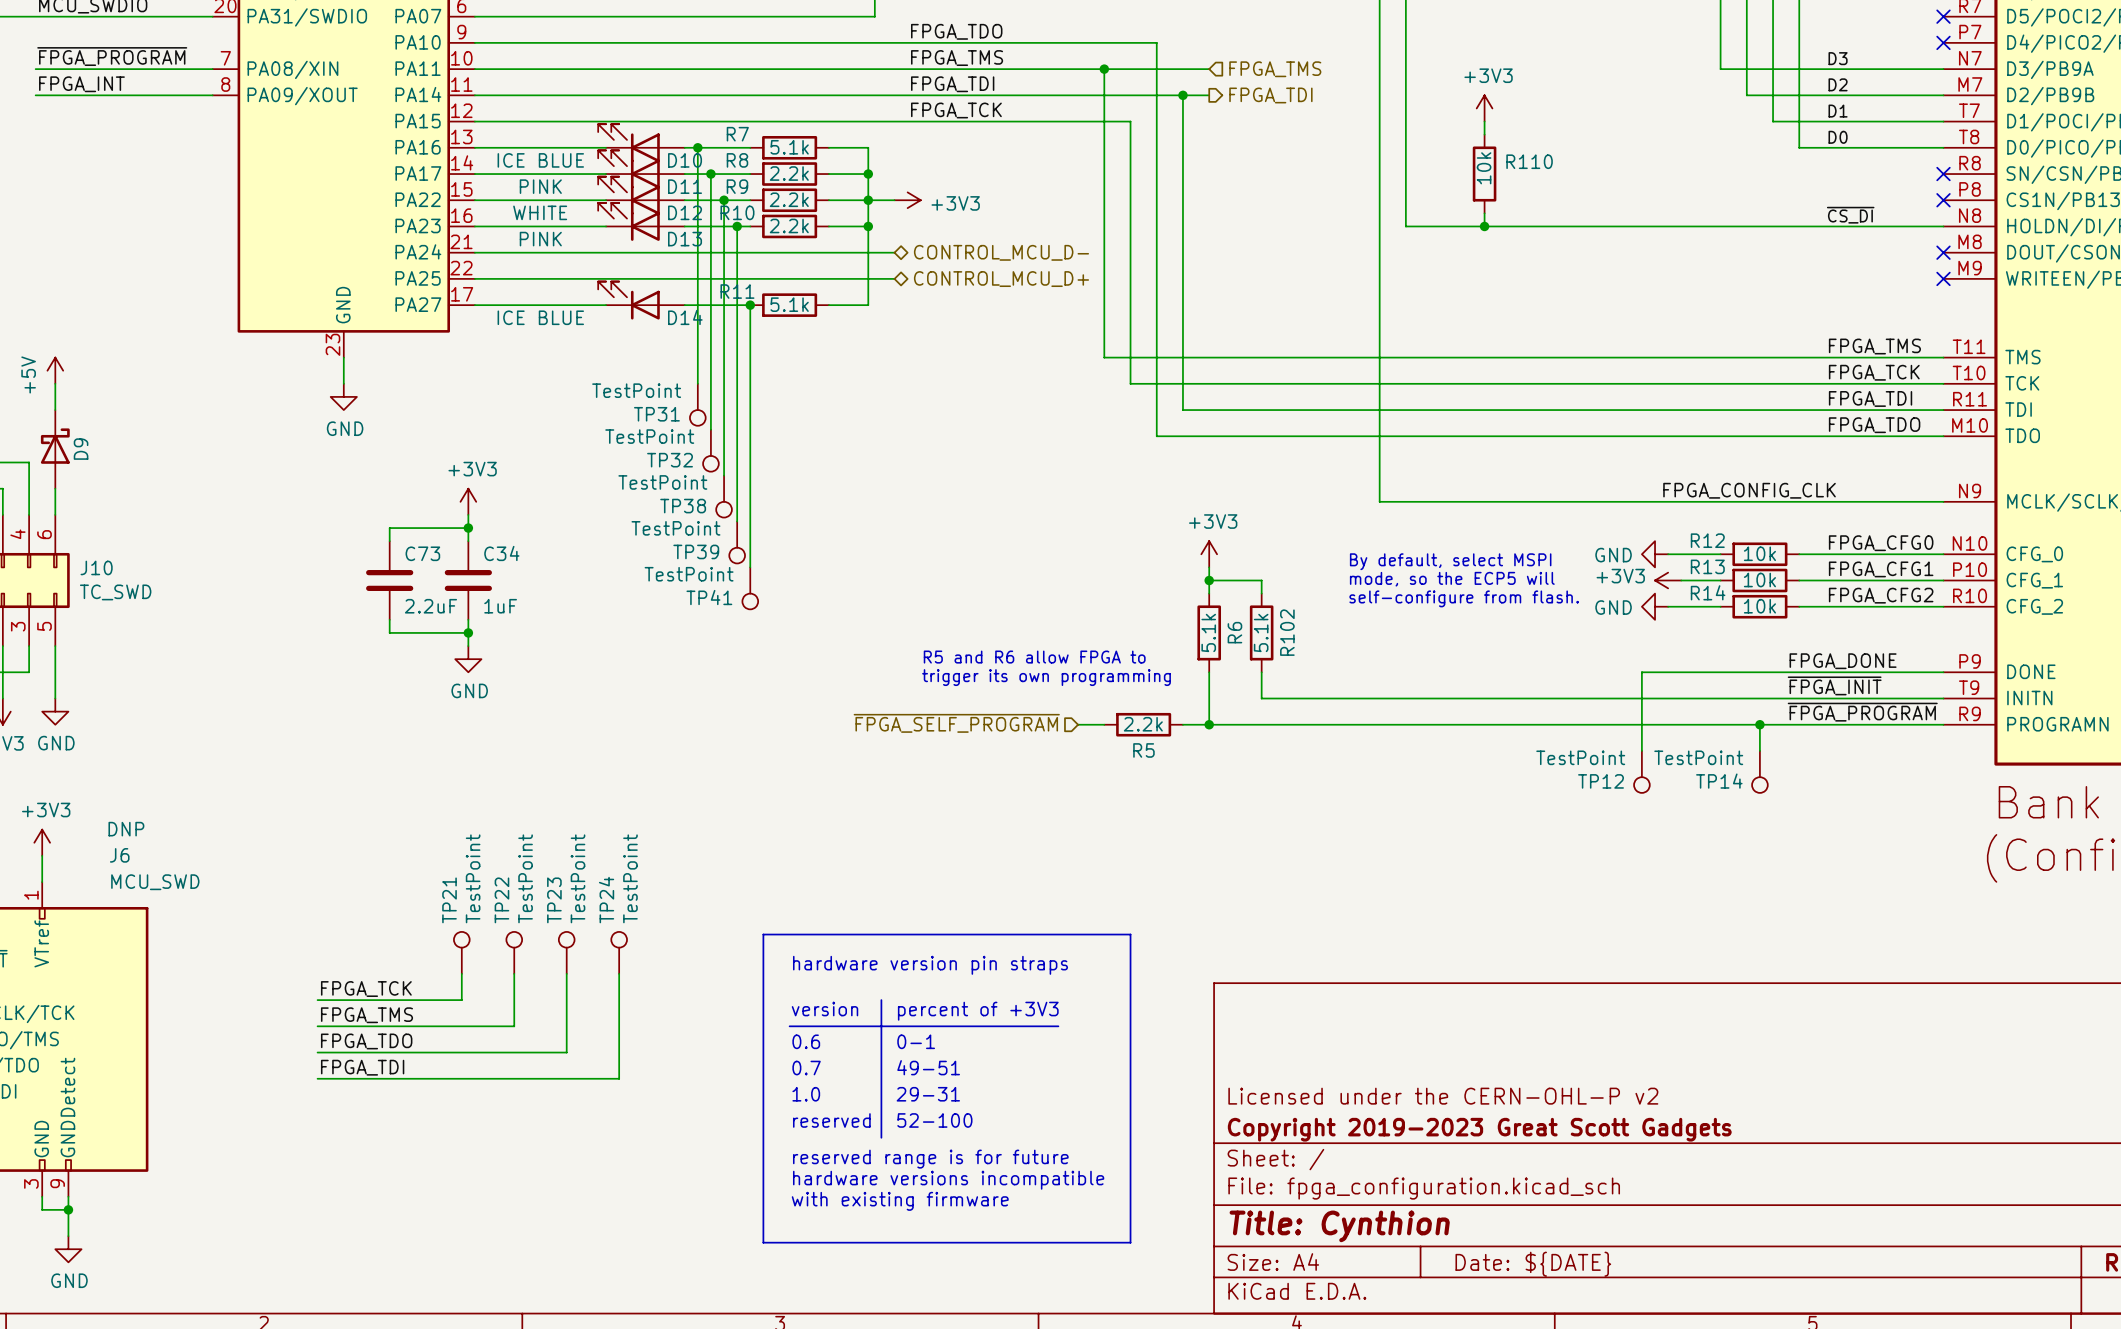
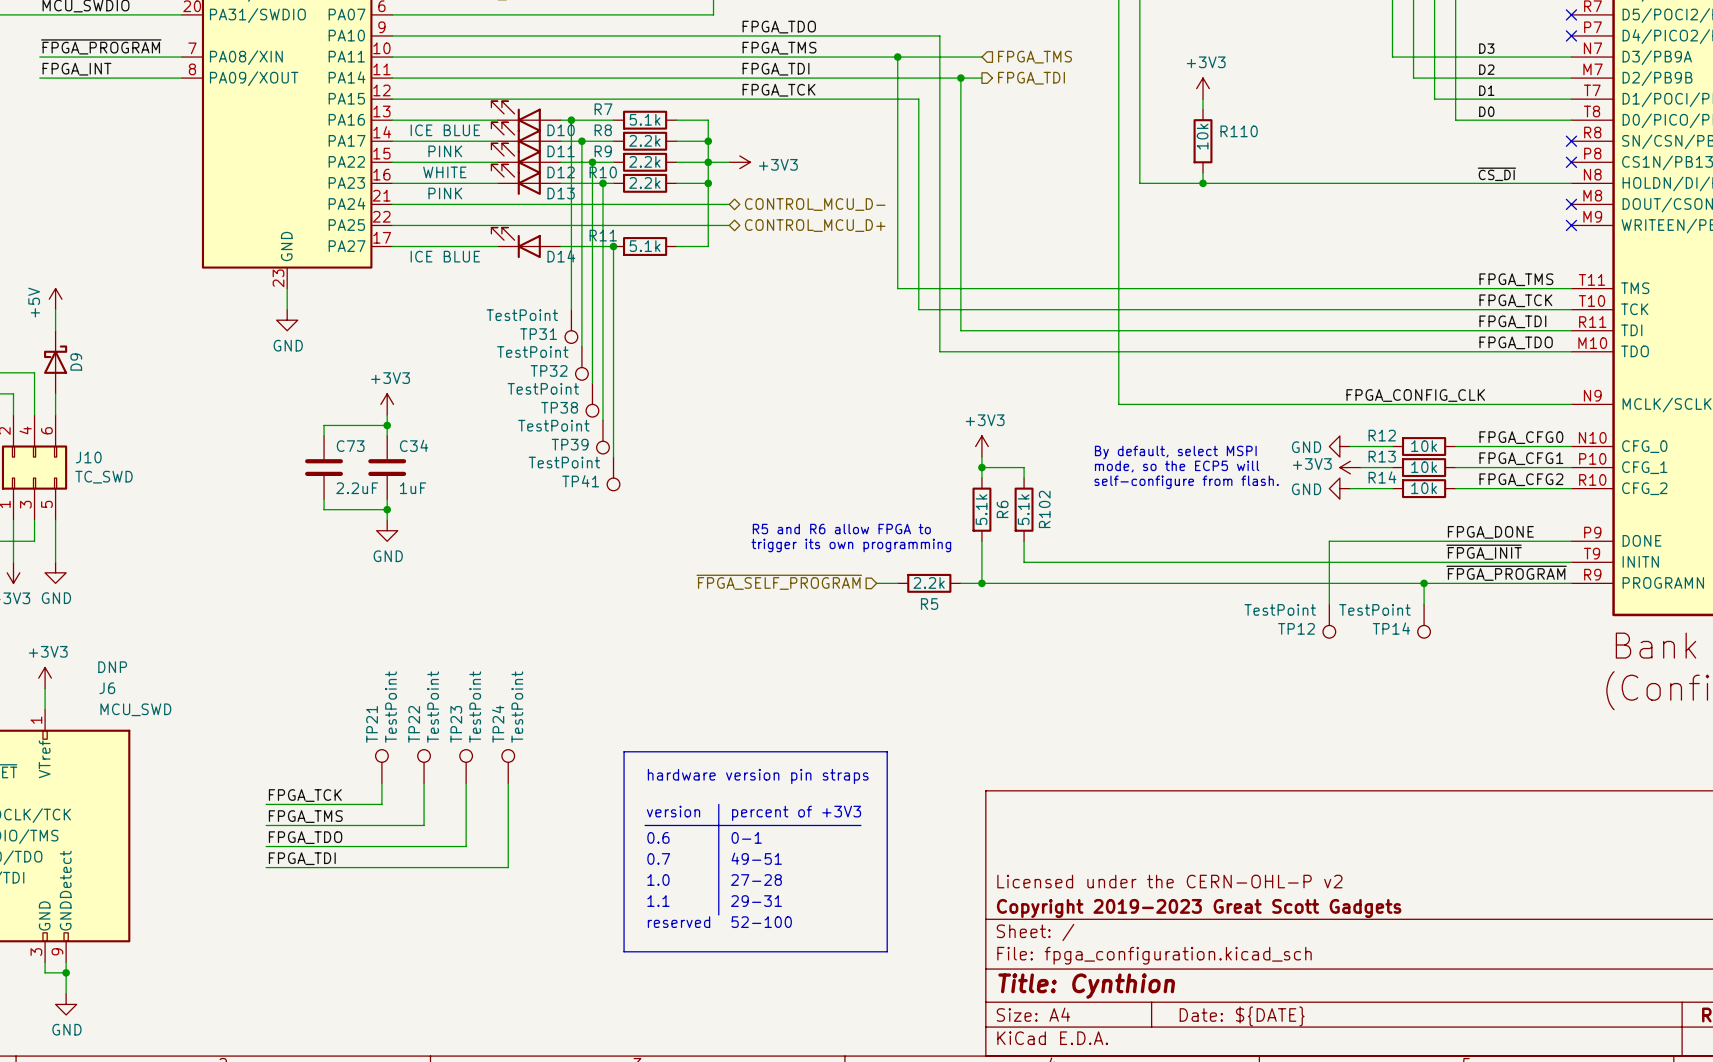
line: (1091, 934) (1130, 934) (1130, 1242) (763, 1242) (763, 1183) -> (887, 751) (887, 951) (624, 951)
text: 29-31 (928, 1094) -> 27-28 (756, 880)
text: reserved (831, 1120) -> 1.1 (658, 901)
text: 52-100 (934, 1120) -> 29-31 (756, 901)
text: none -> 52-100 (761, 922)
text: reserved range is for future (930, 1159) -> reserved (679, 922)
text: hardware versions incompatible (948, 1180) -> none
text: with existing firmware (900, 1201) -> none

